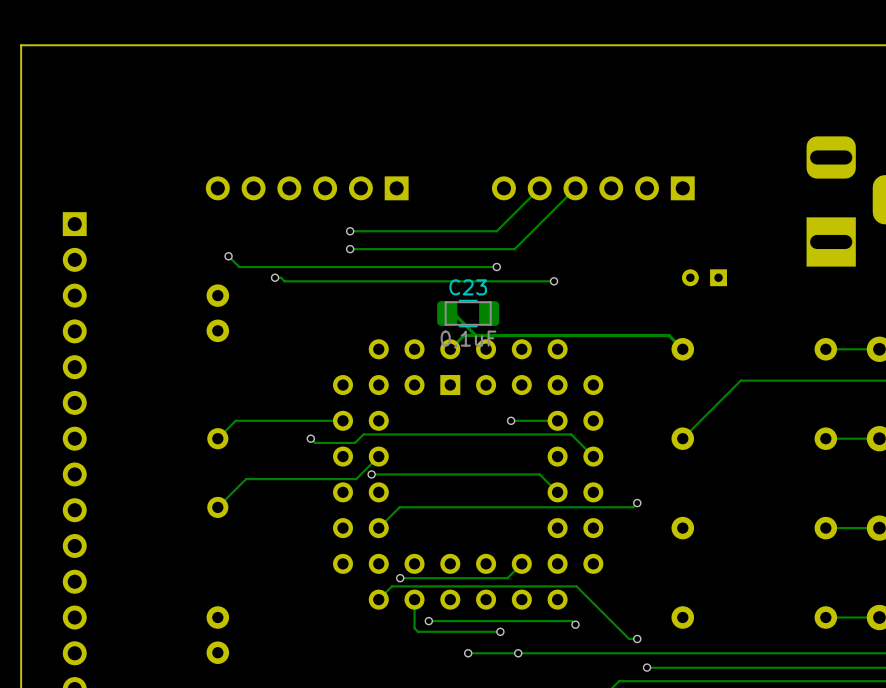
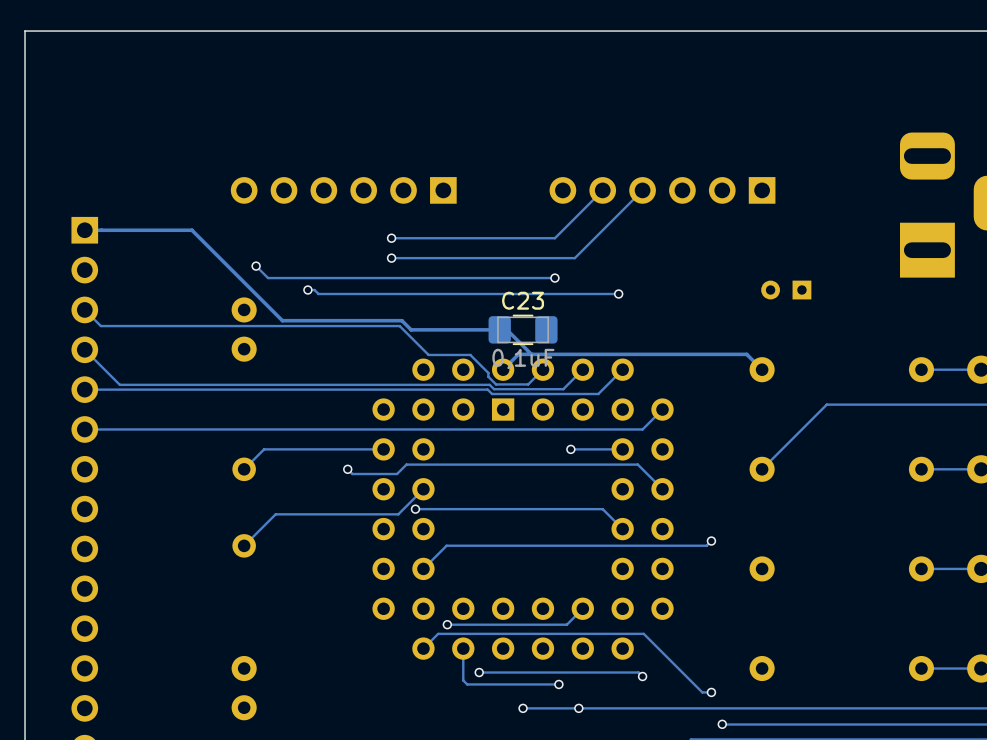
track: none -> (84, 230) (191, 230) (282, 320) (401, 320) (411, 329) (499, 329)
track: none -> (84, 309) (100, 326) (399, 326) (428, 354) (470, 354) (488, 372) (488, 376) (496, 384) (528, 384) (542, 369)
track: none -> (84, 349) (119, 384) (489, 384) (494, 389) (563, 389) (582, 369)
track: none -> (622, 369) (598, 394) (492, 394) (487, 389) (84, 389)
track: none -> (662, 409) (642, 429) (84, 429)

